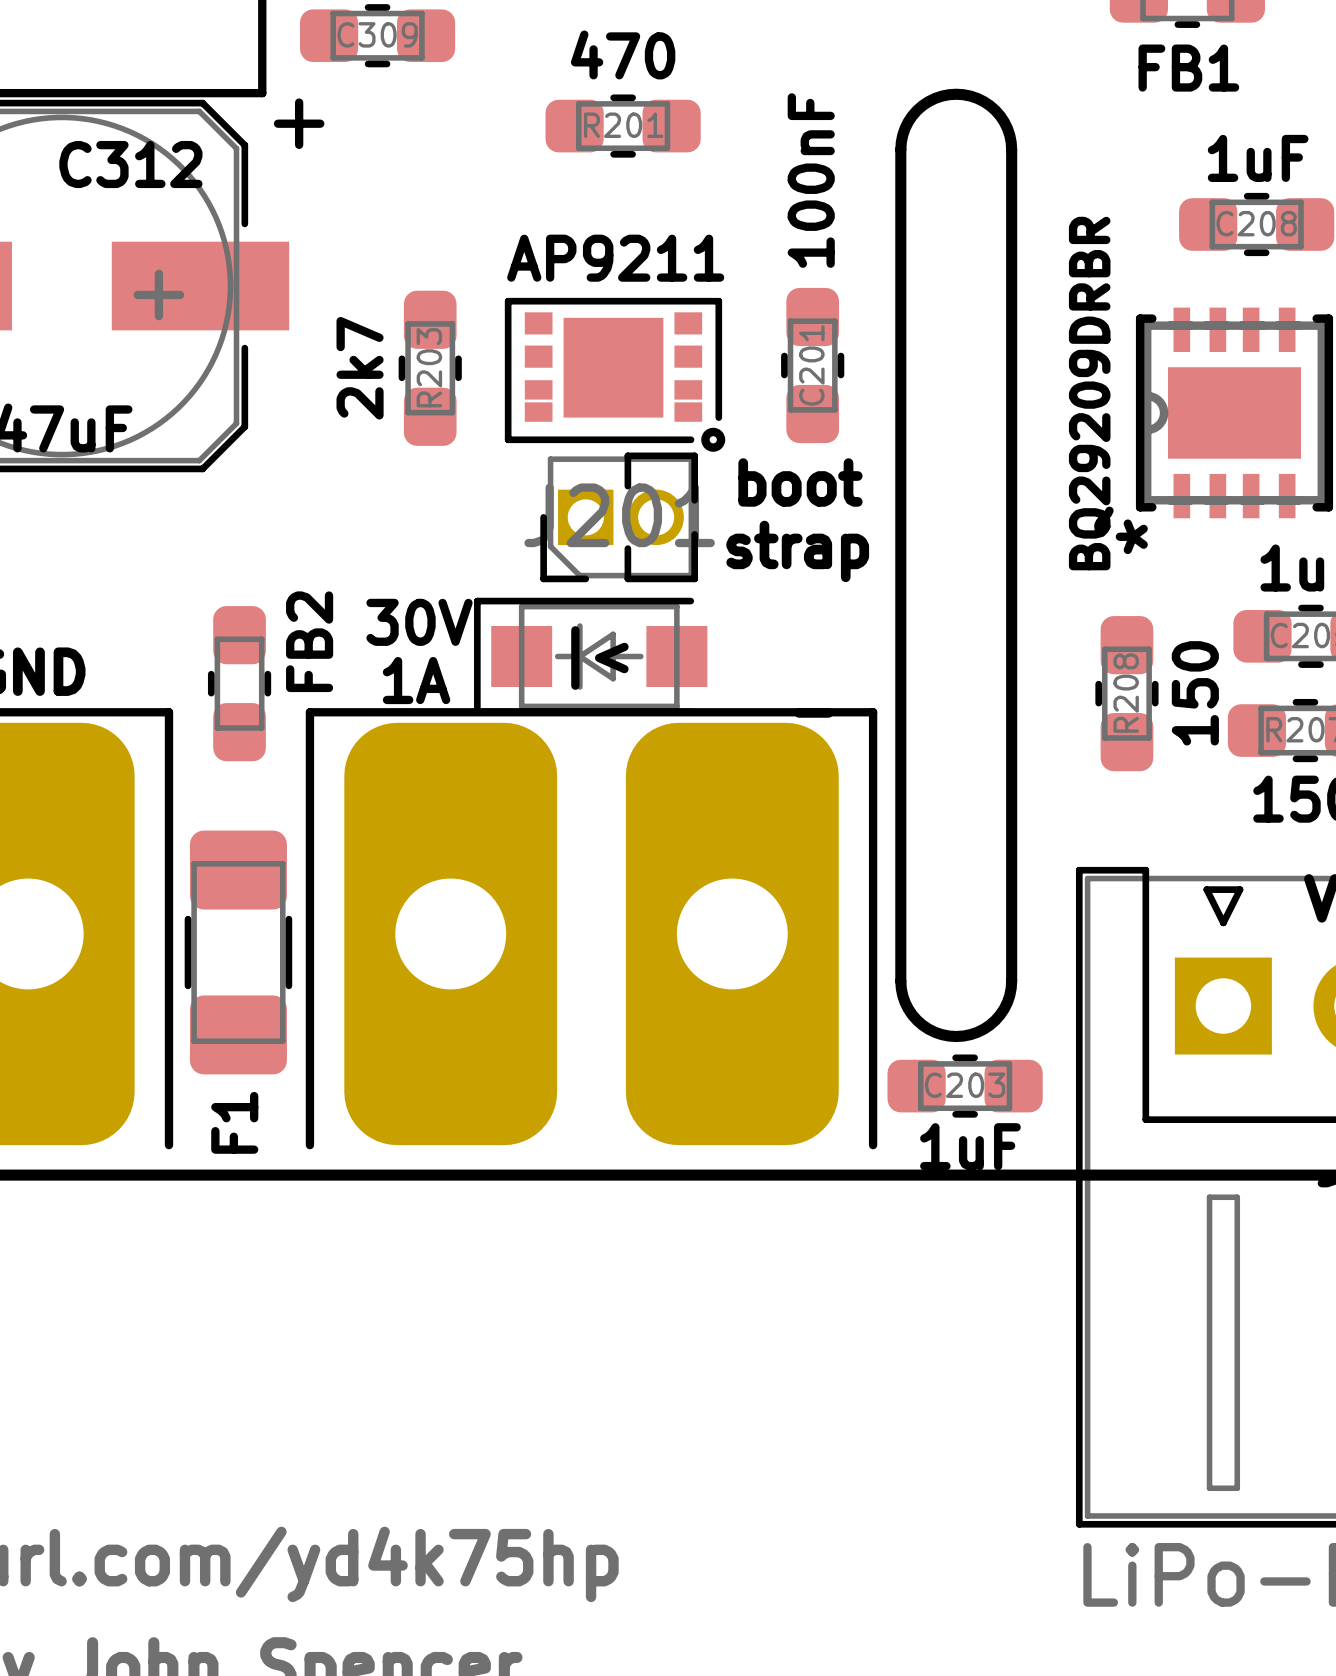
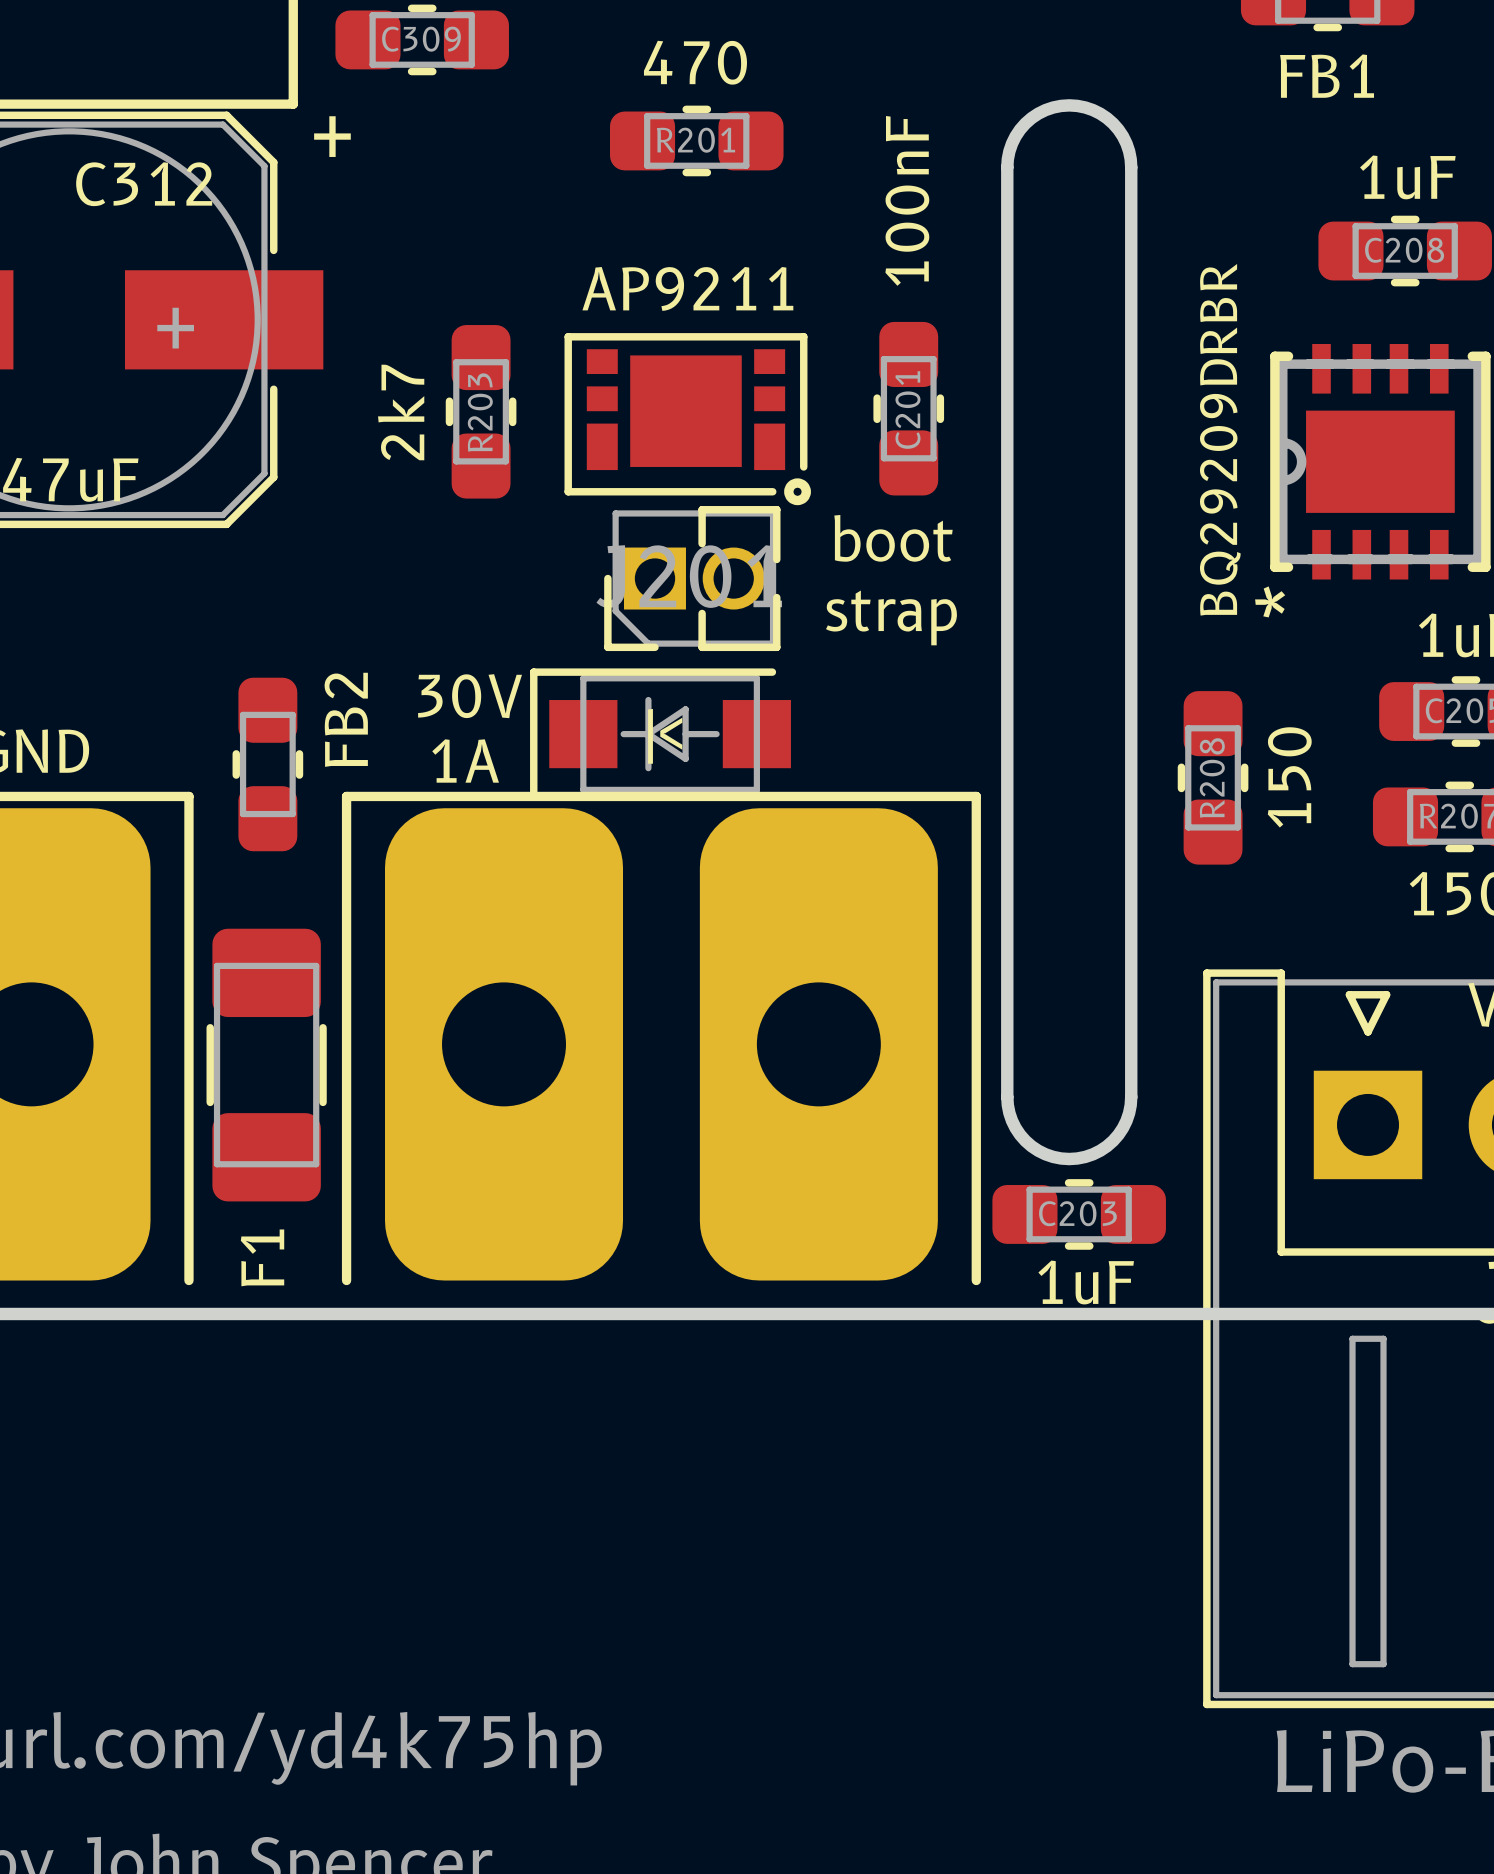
part footprint: [504, 297, 726, 452] -> [564, 333, 811, 506]
R208 position: (1126, 693) -> (1213, 777)

